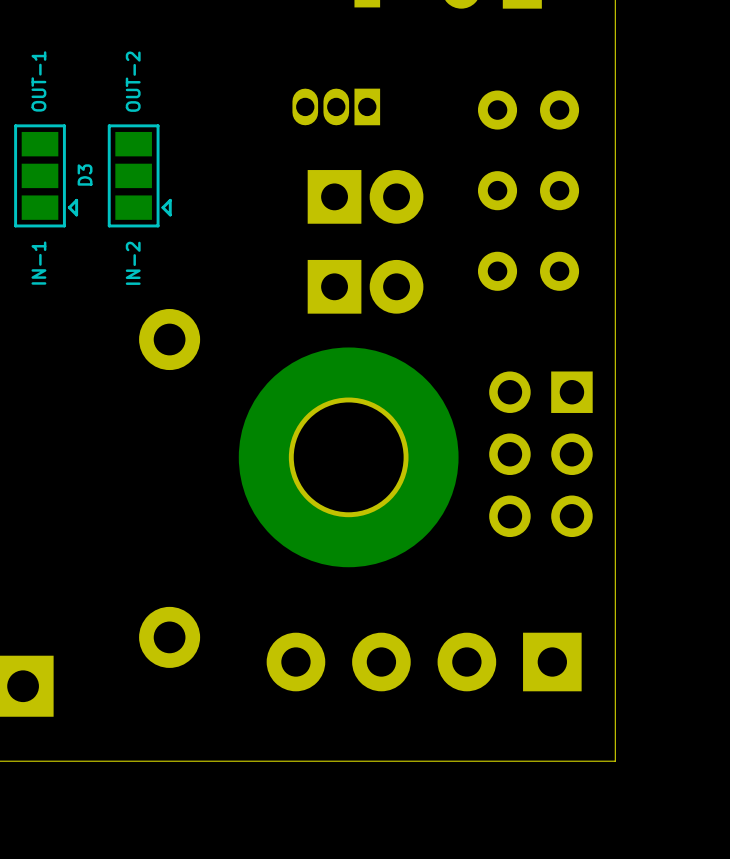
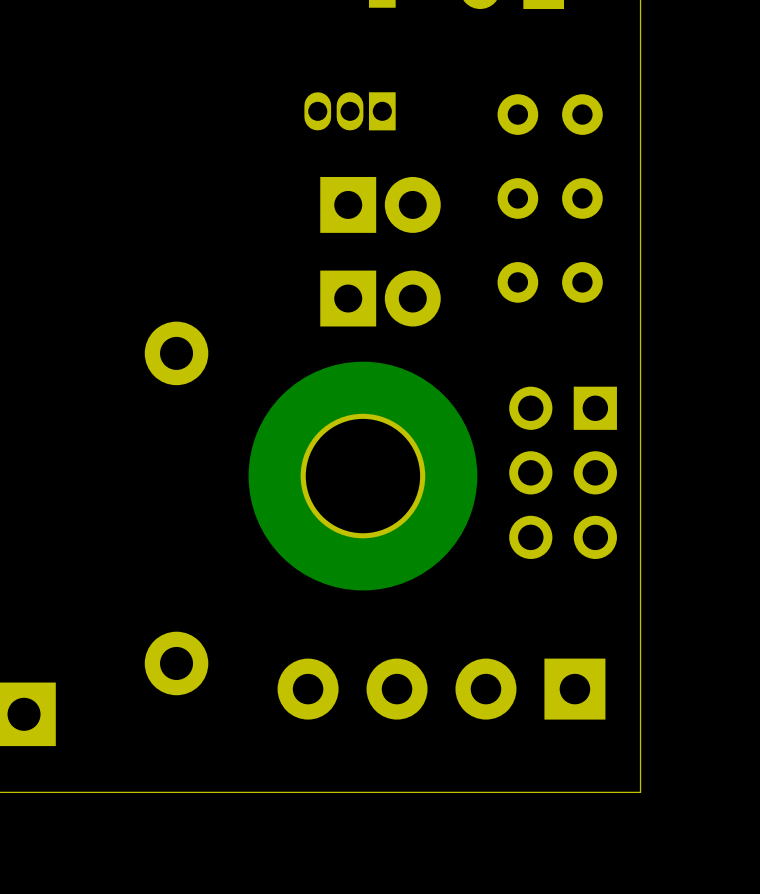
text: OUT-1 (38, 81) -> none
text: OUT-2 (133, 81) -> none
part: (46, 175) -> none
text: D3 (85, 175) -> none
part: (139, 175) -> none
text: IN-1 (38, 263) -> none
text: IN-2 (133, 263) -> none

